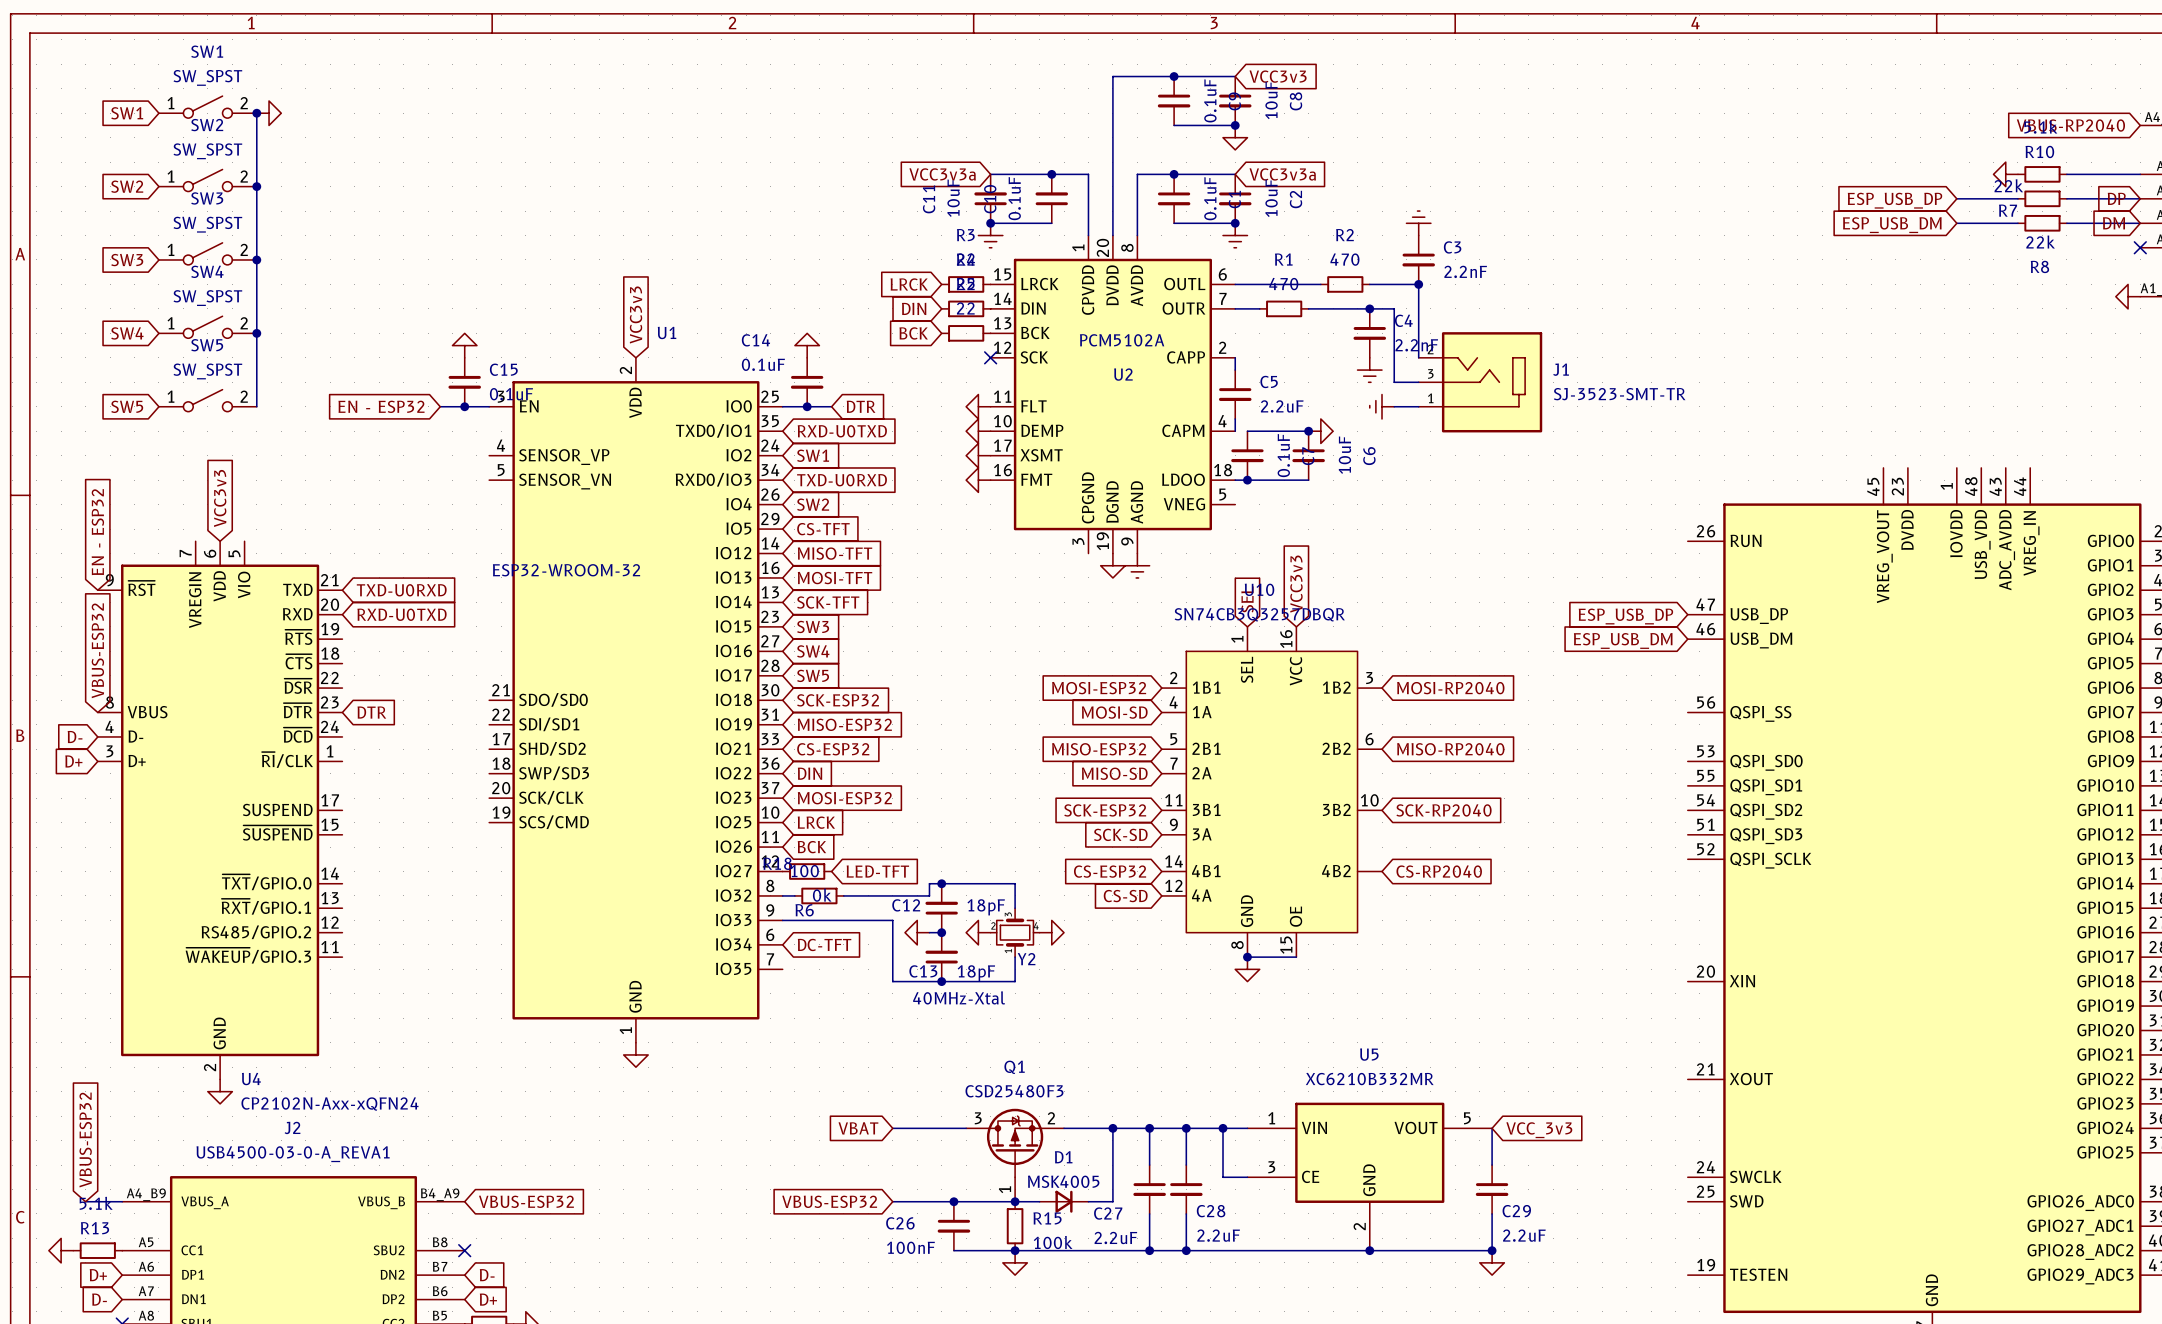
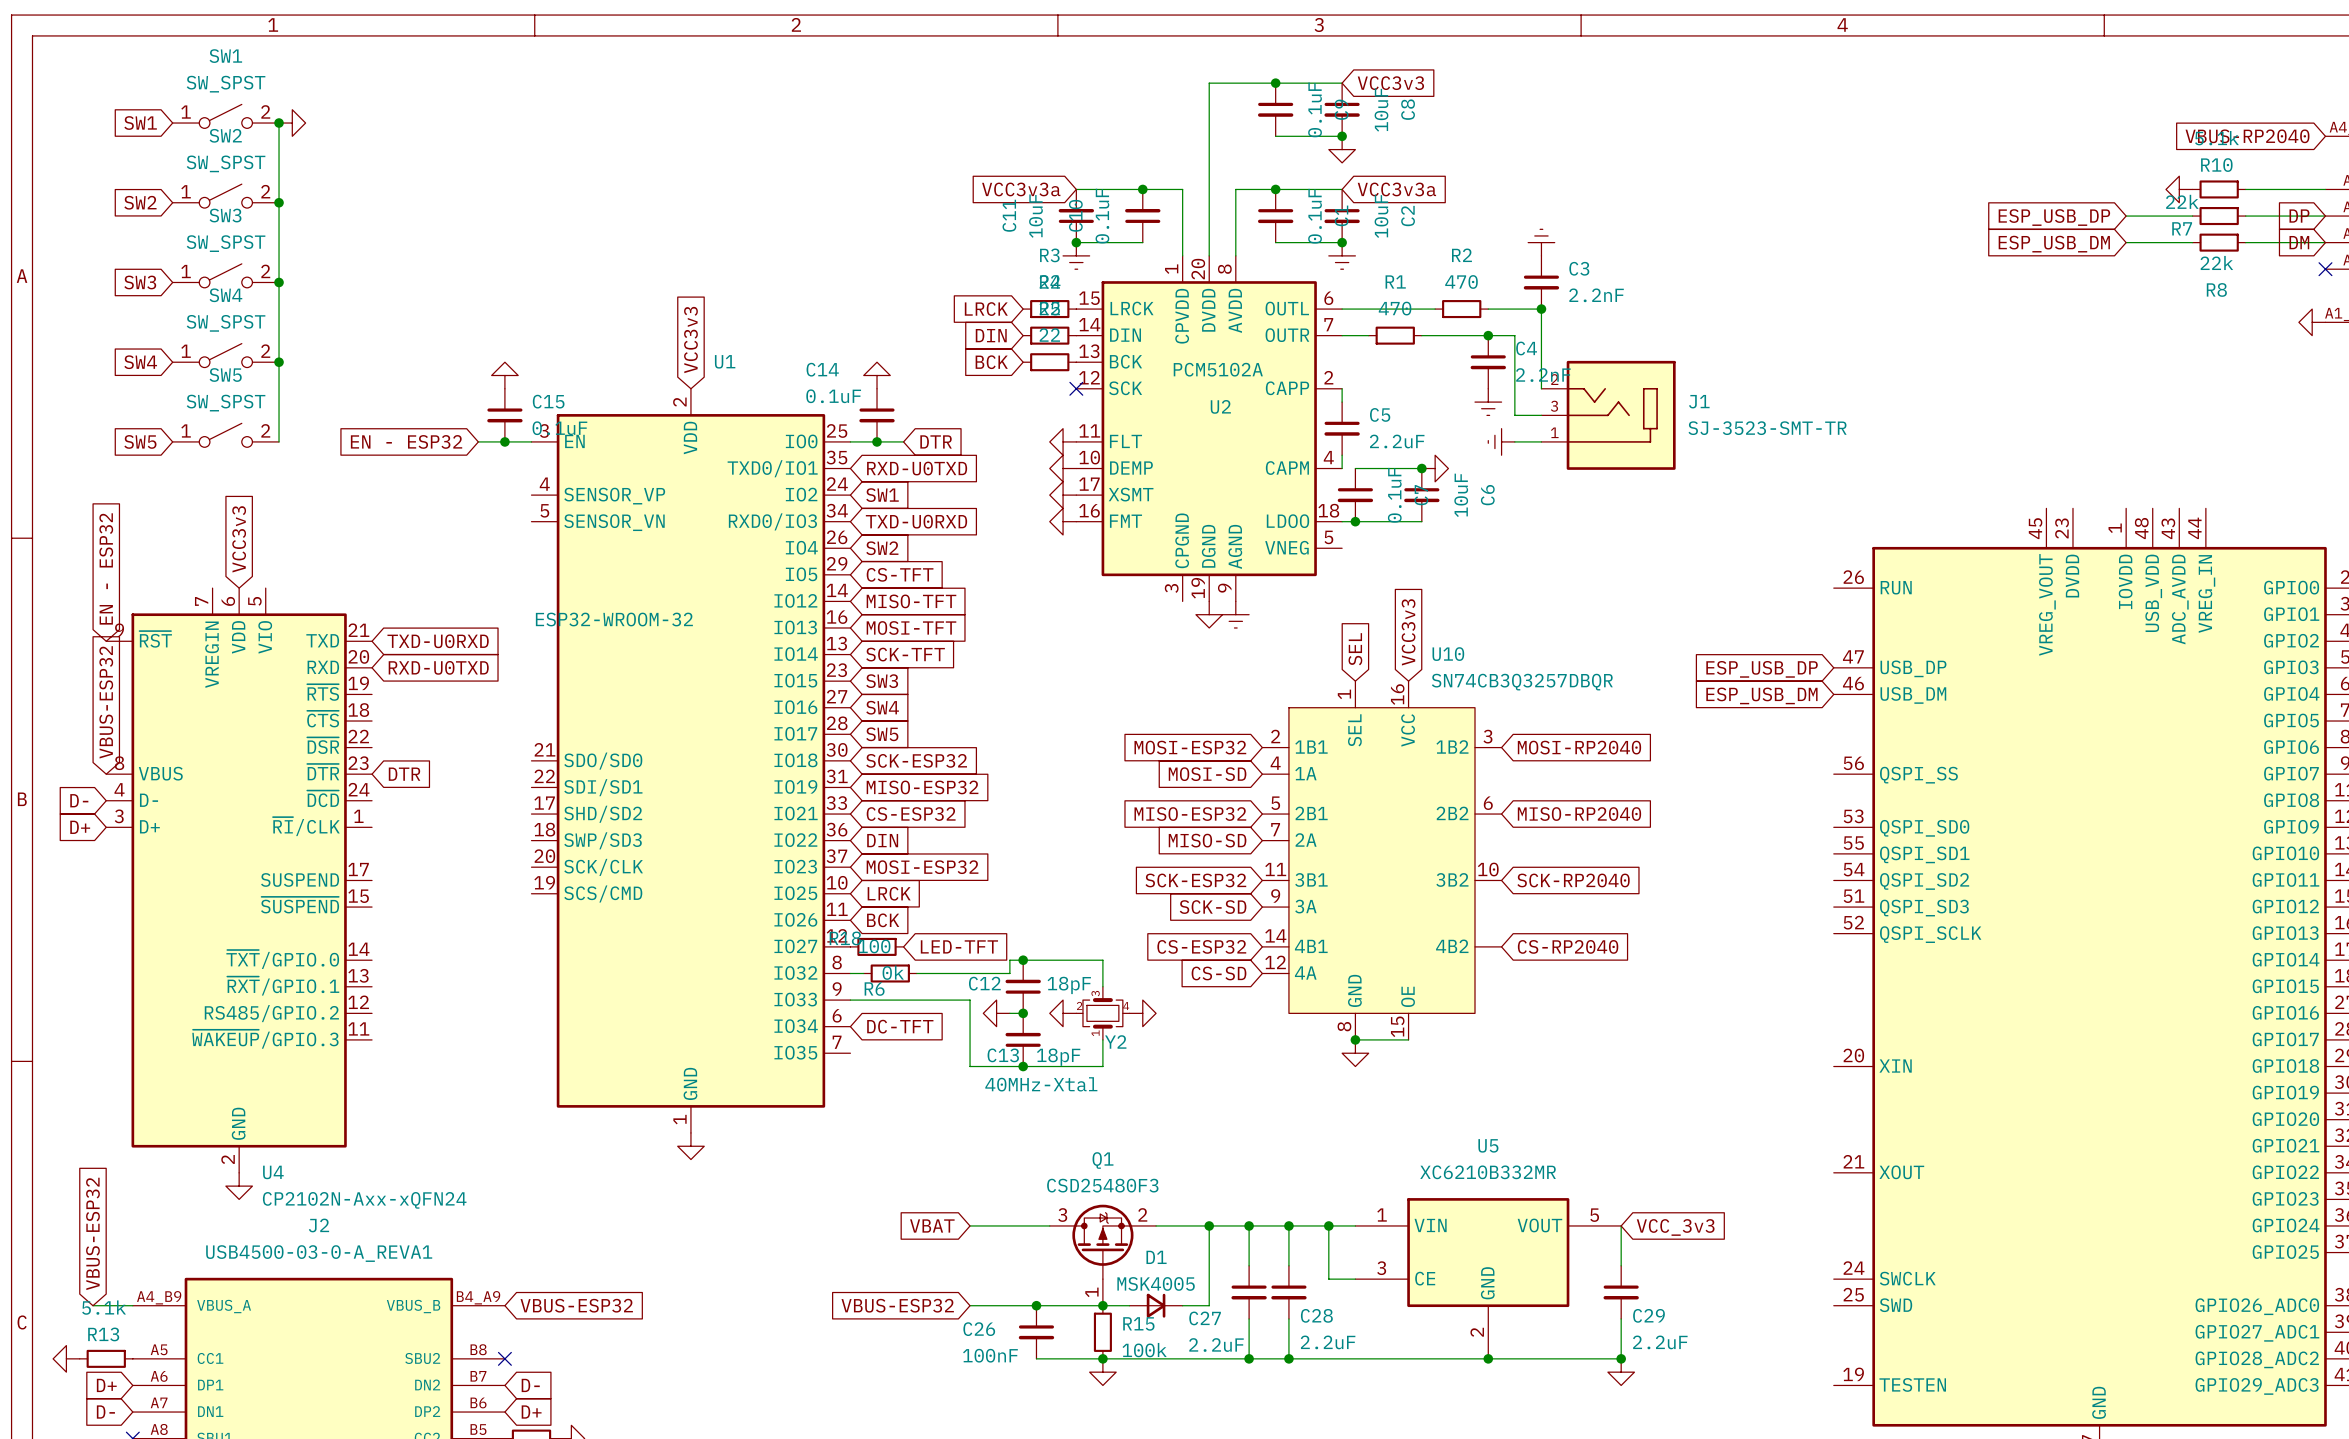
U10 name position: U10 (1259, 589) -> U10 (1448, 654)
U10 value position: SN74CB3Q3257DBQR (1259, 614) -> SN74CB3Q3257DBQR (1522, 682)

